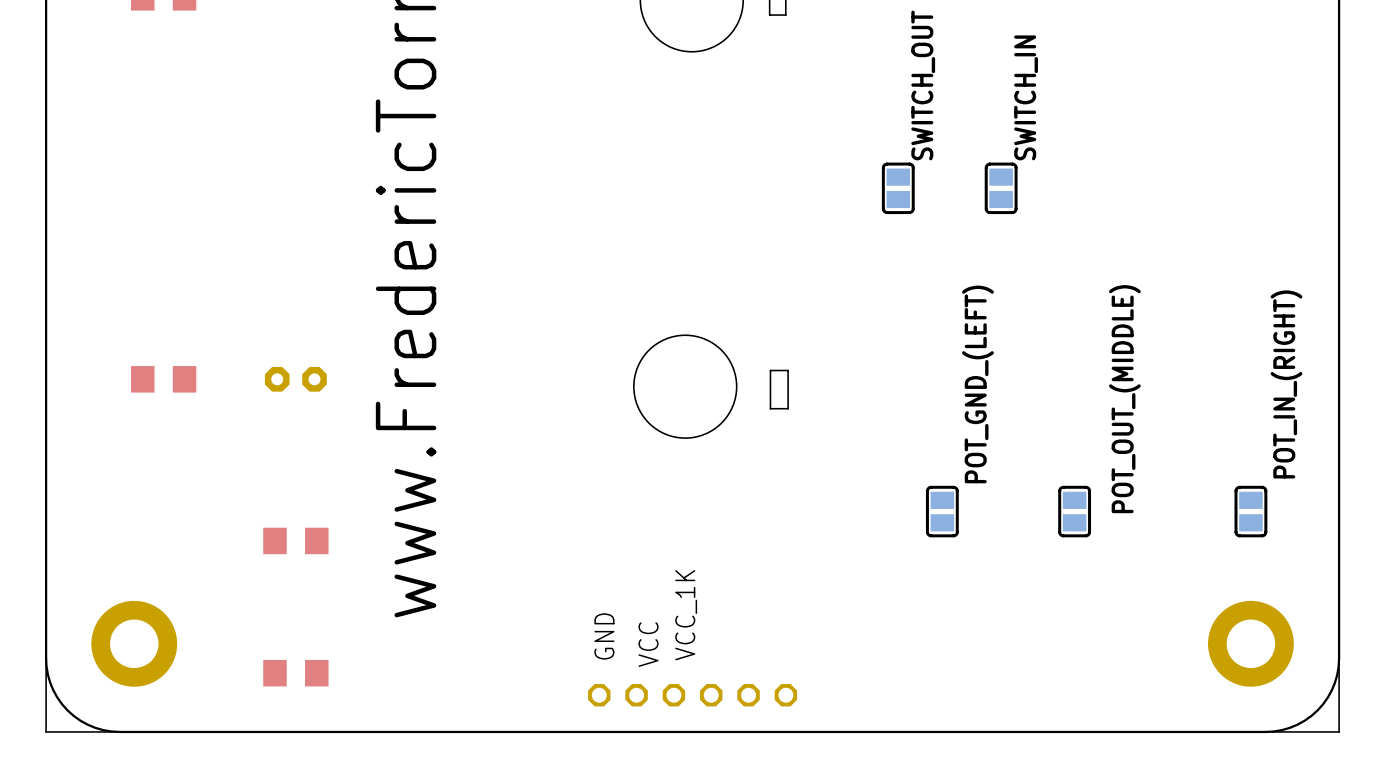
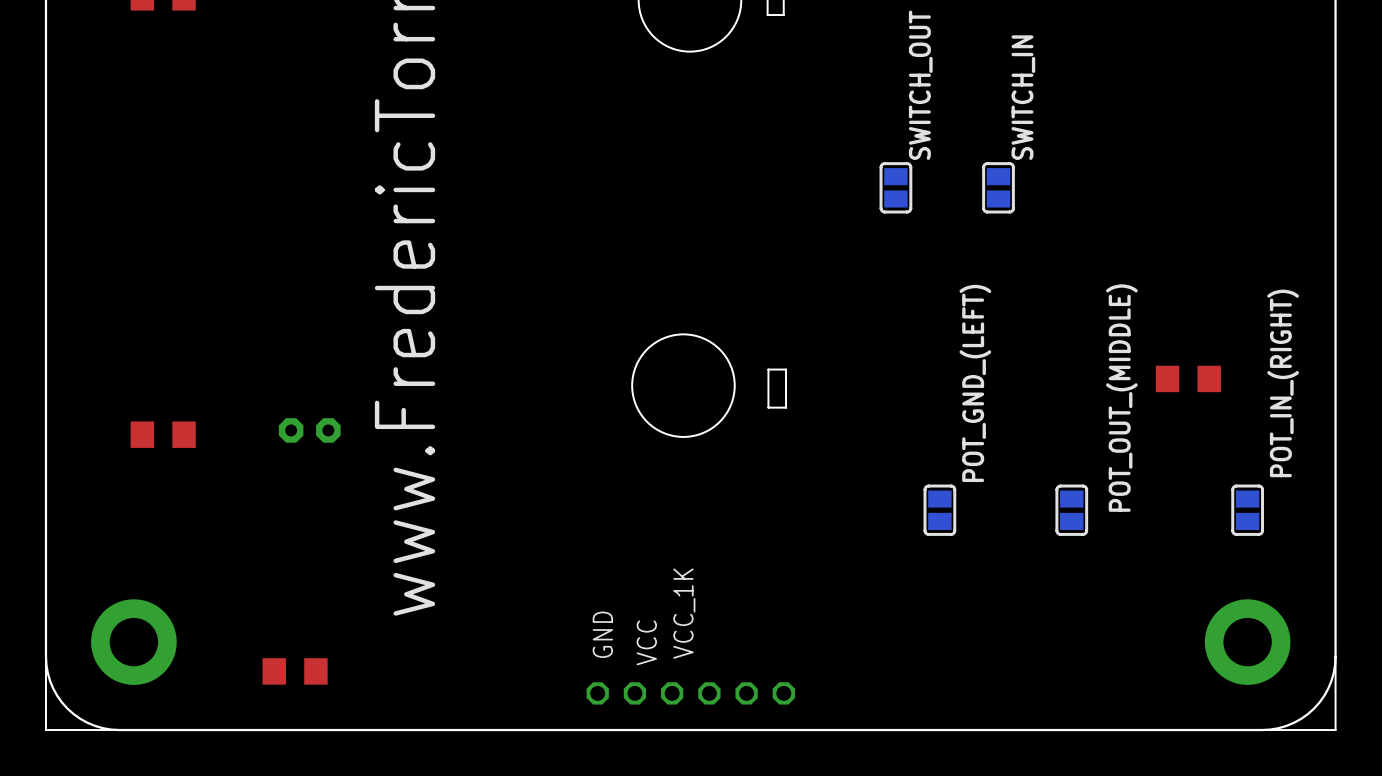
part position: (163, 379) -> (163, 434)
part position: (295, 379) -> (309, 430)
part: none -> (1188, 378)
part: (295, 540) -> none

